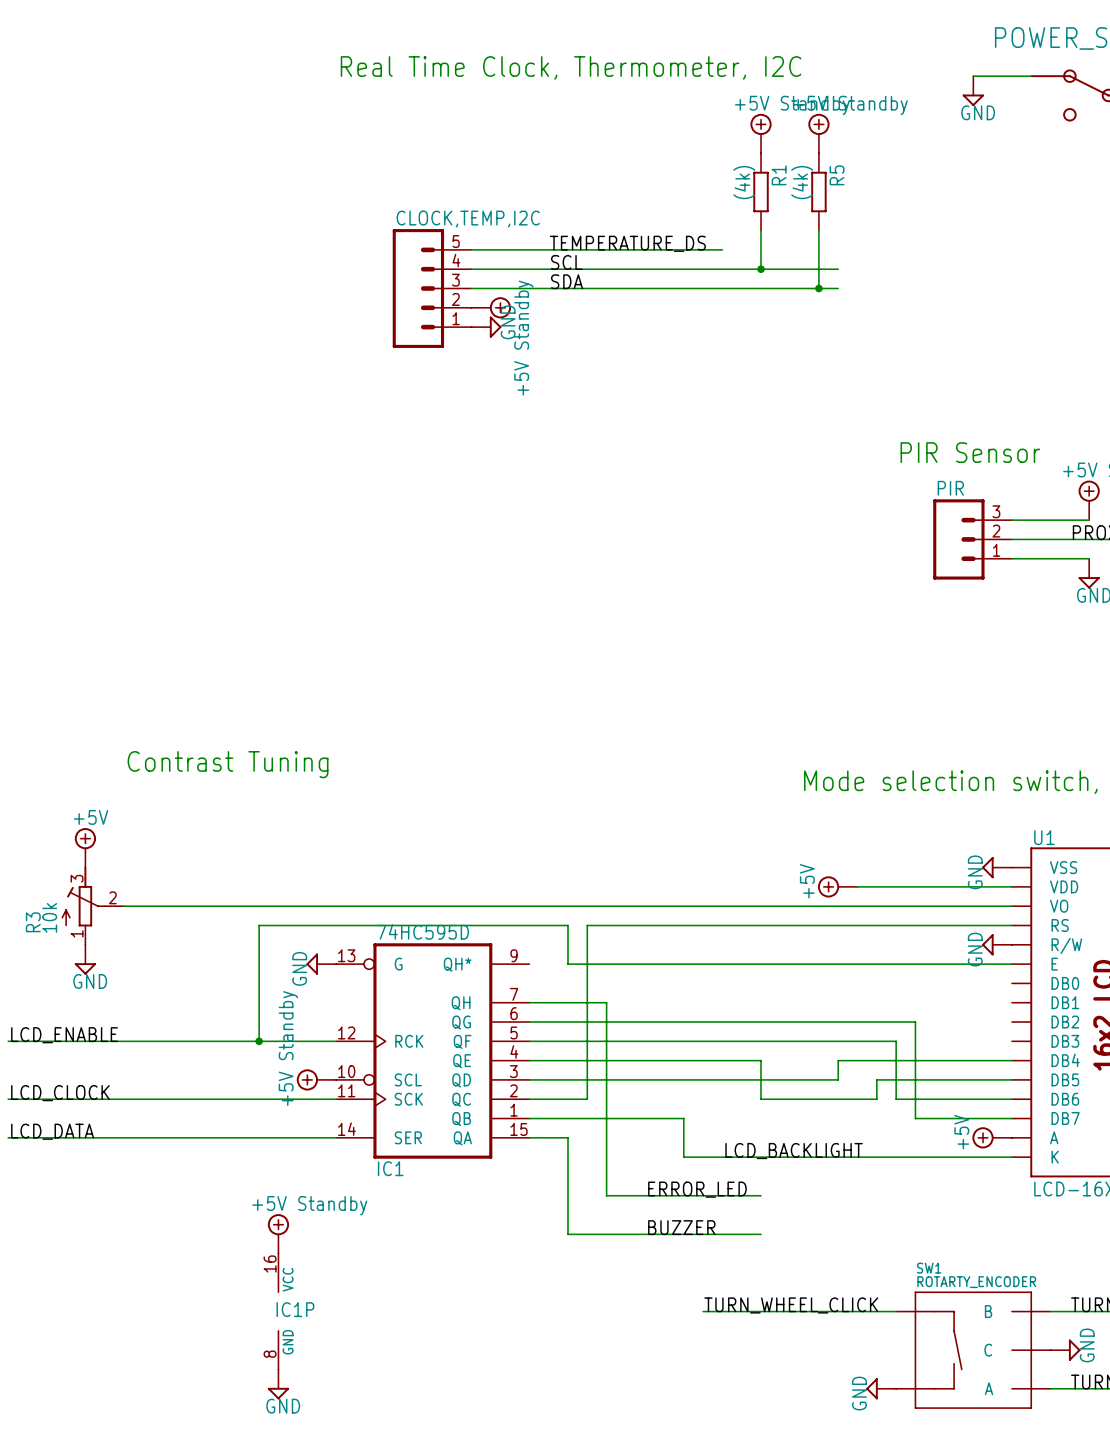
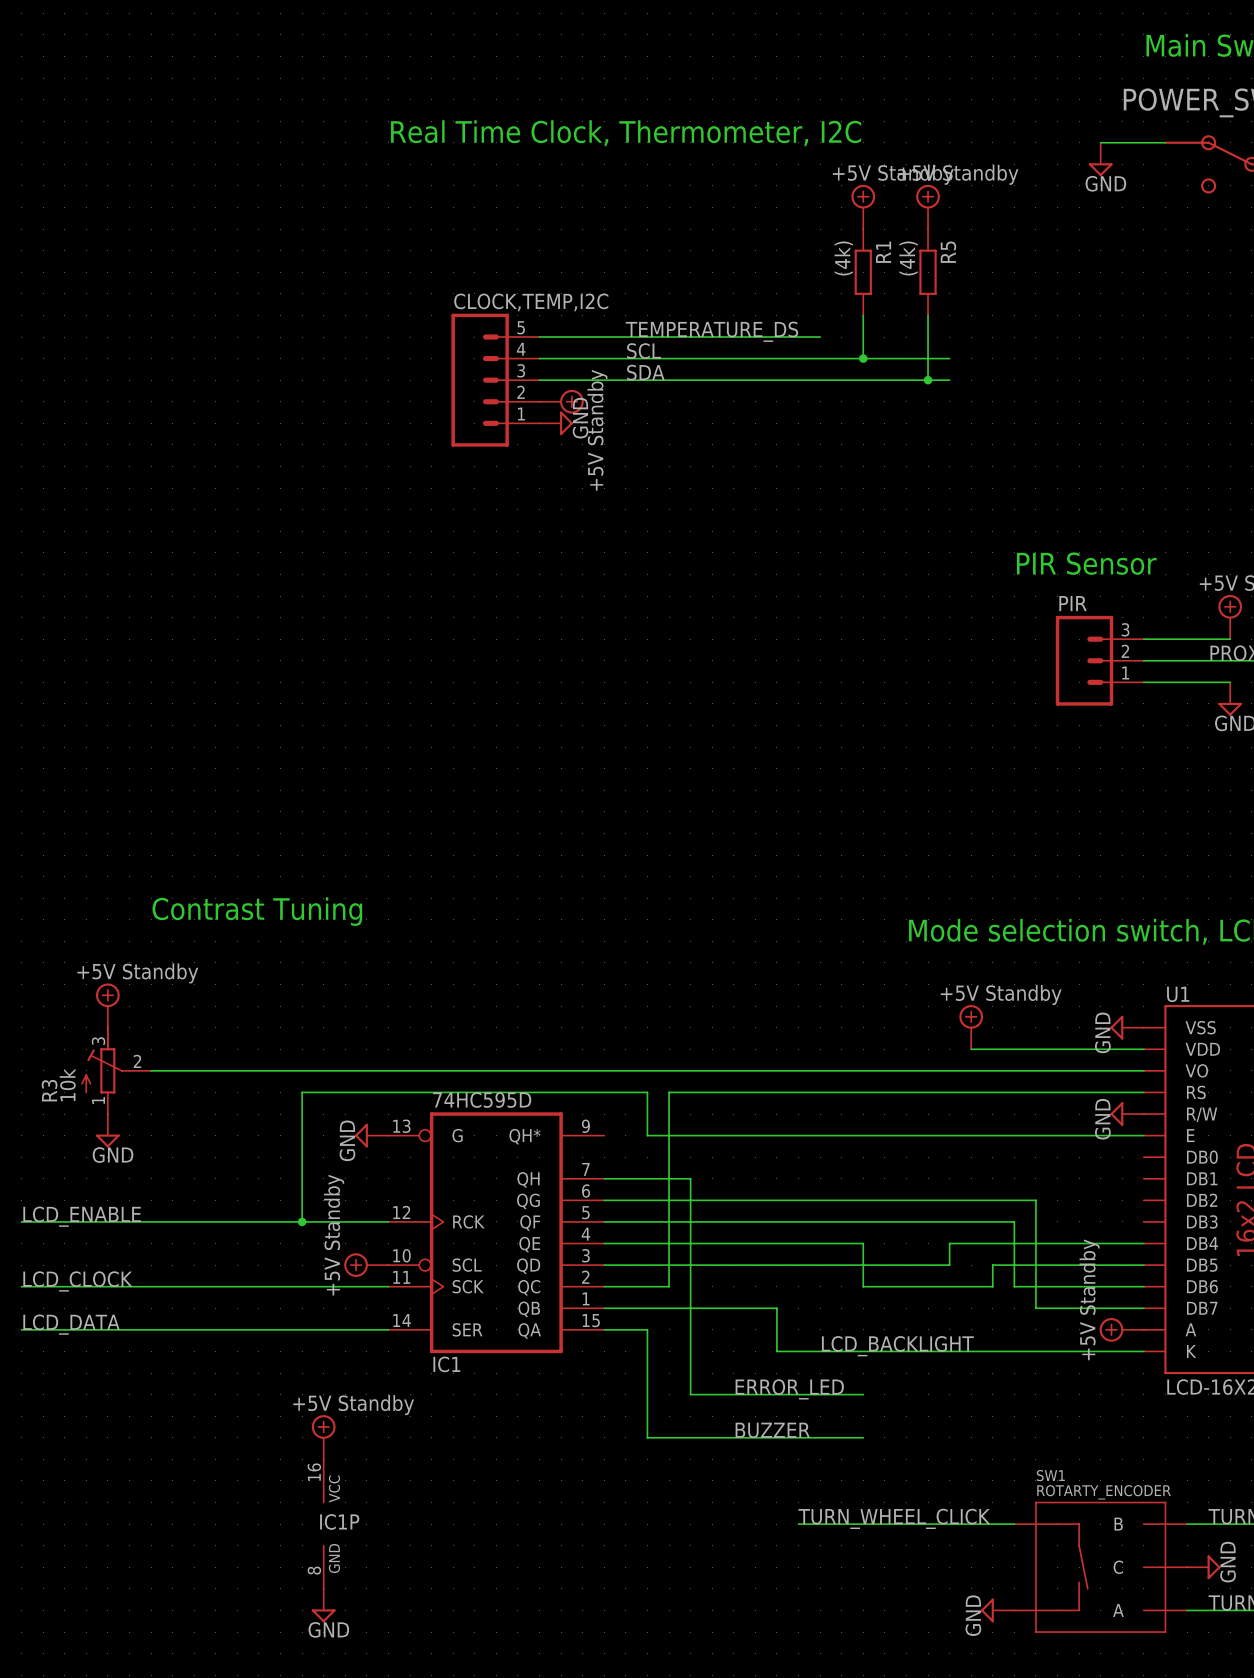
power symbol: +5V (85, 847) -> +5V Standby (107, 1005)
power symbol: none -> +5V Standby (971, 1027)
power symbol: +5V (837, 886) -> none
power symbol: +5V (992, 1137) -> +5V Standby (1121, 1329)

